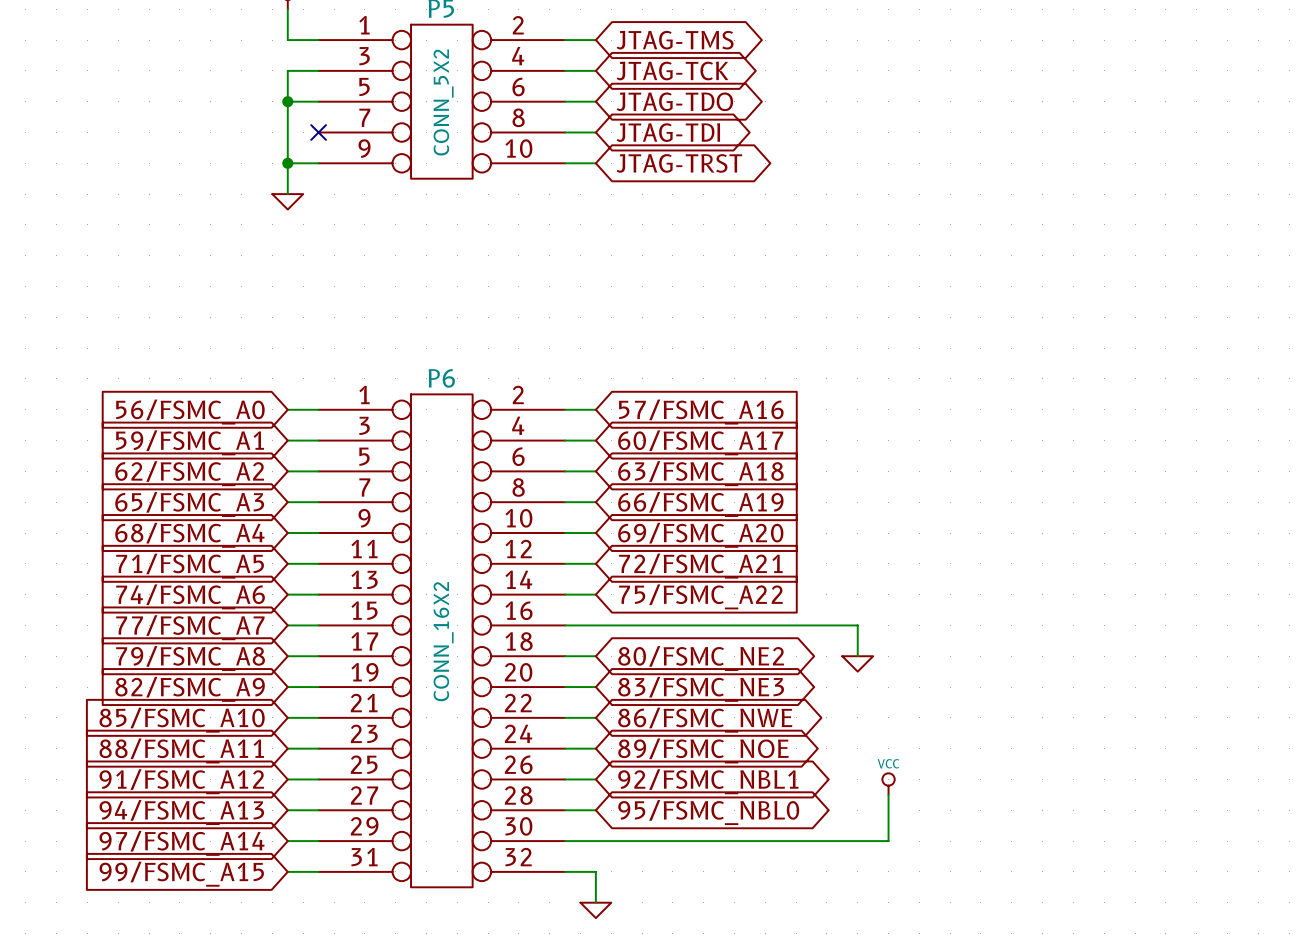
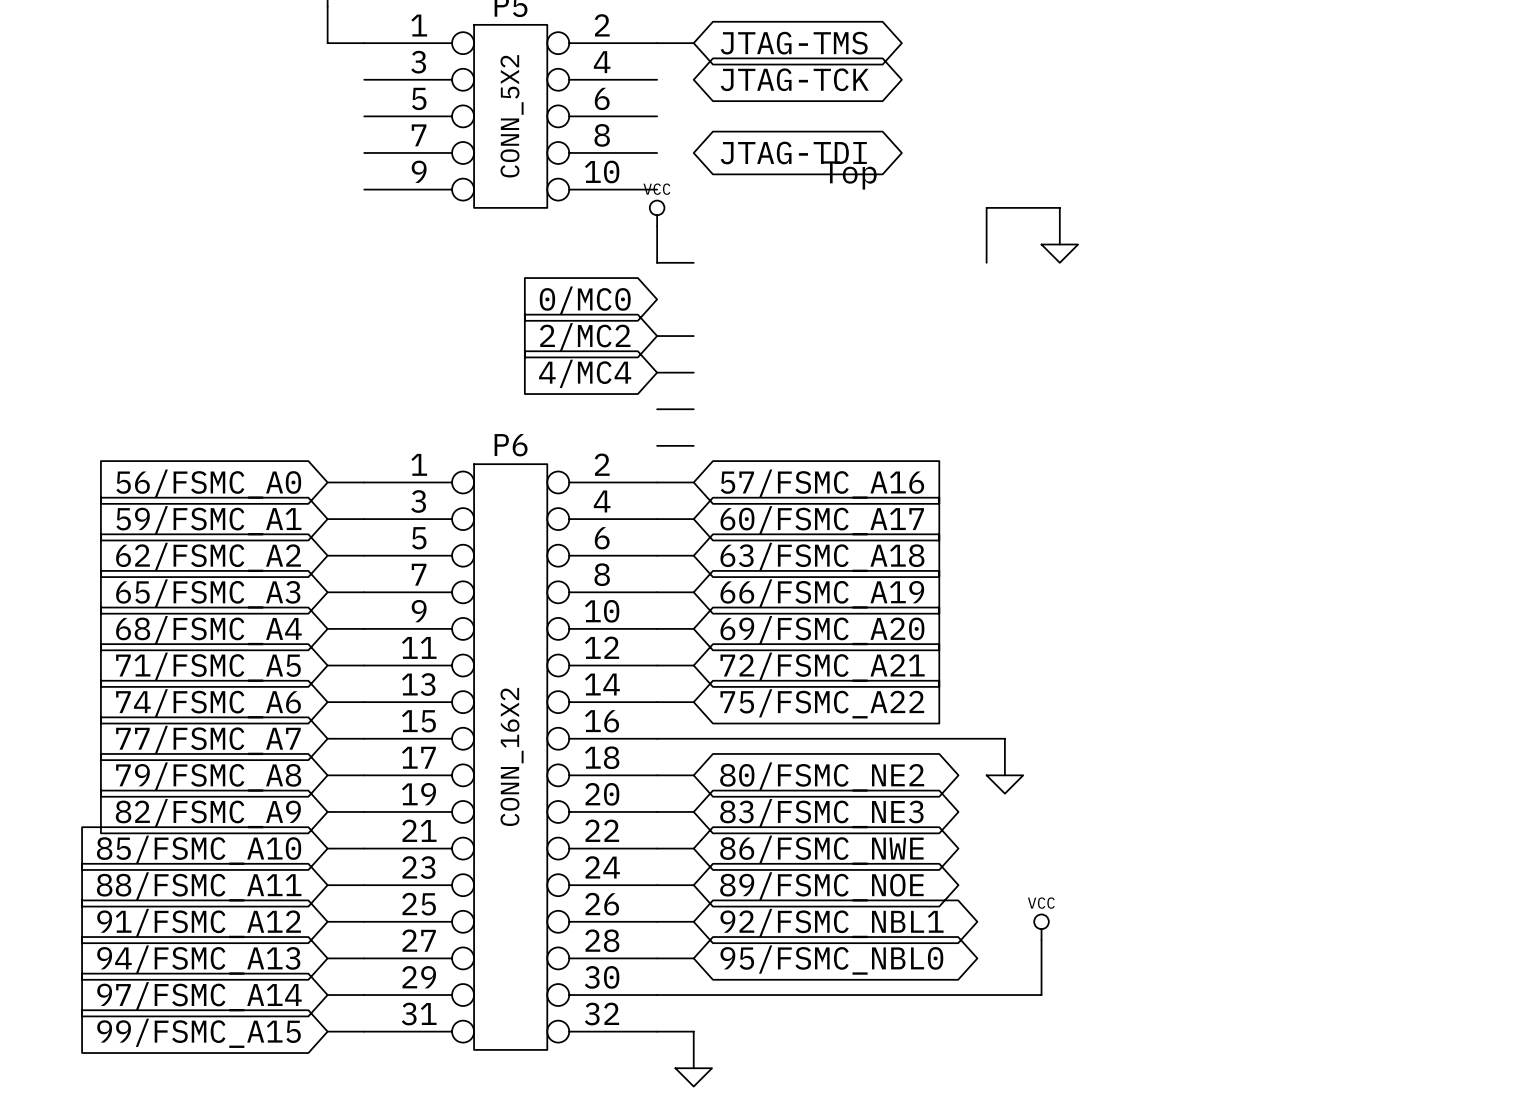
wire: (318, 70) (287, 70) (287, 194) -> none
wire: (565, 70) (595, 70) -> (657, 336) (693, 336)
wire: (287, 101) (318, 101) -> none
junction: (287, 101) -> none
wire: (565, 101) (595, 101) -> (657, 372) (693, 372)
global label: JTAG-TDO (674, 101) -> none
no-connect mark: (318, 132) -> none
wire: (565, 132) (595, 132) -> (657, 409) (693, 409)
text: none -> Top (849, 175)
wire: (287, 163) (318, 163) -> none
junction: (287, 163) -> none
wire: (565, 163) (595, 163) -> (657, 445) (693, 445)
global label: JTAG-TRST (679, 163) -> none
power symbol: none -> VCC (657, 213)
wire: none -> (657, 226) (657, 262) (693, 262)
power symbol: (287, 201) -> none
wire: none -> (1059, 244) (1059, 207) (986, 207) (986, 262)
power symbol: none -> (1059, 253)
global label: none -> 0/MC0 (585, 300)
global label: none -> 2/MC2 (585, 337)
global label: none -> 4/MC4 (585, 373)

